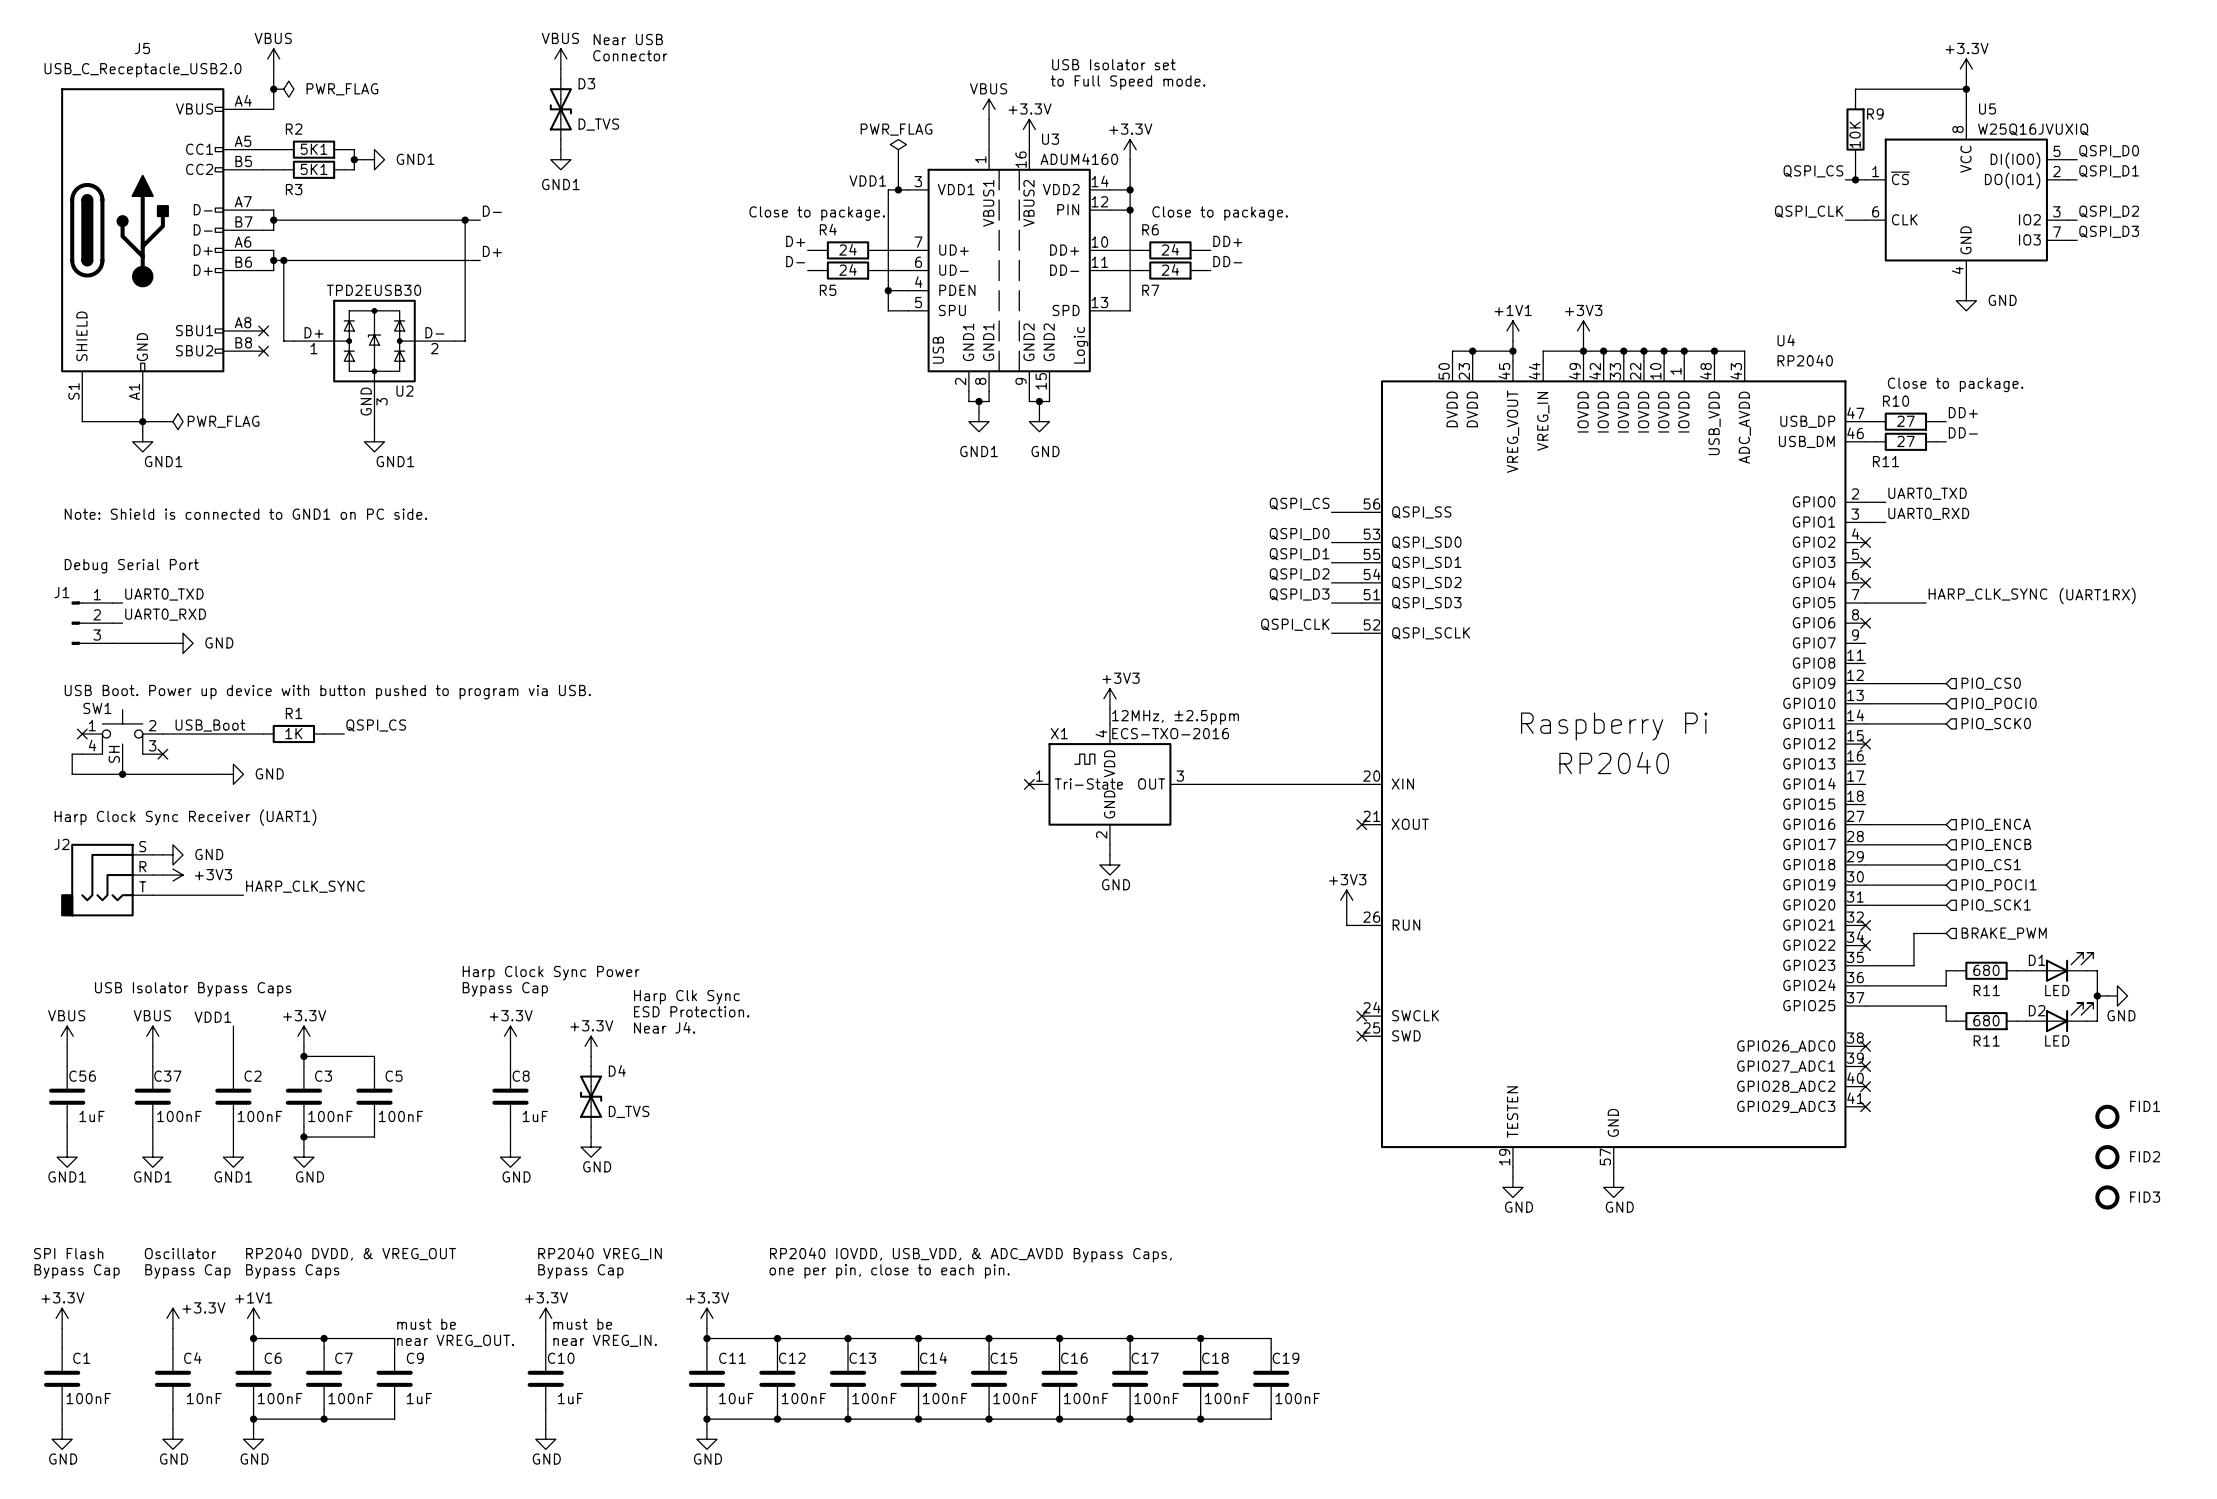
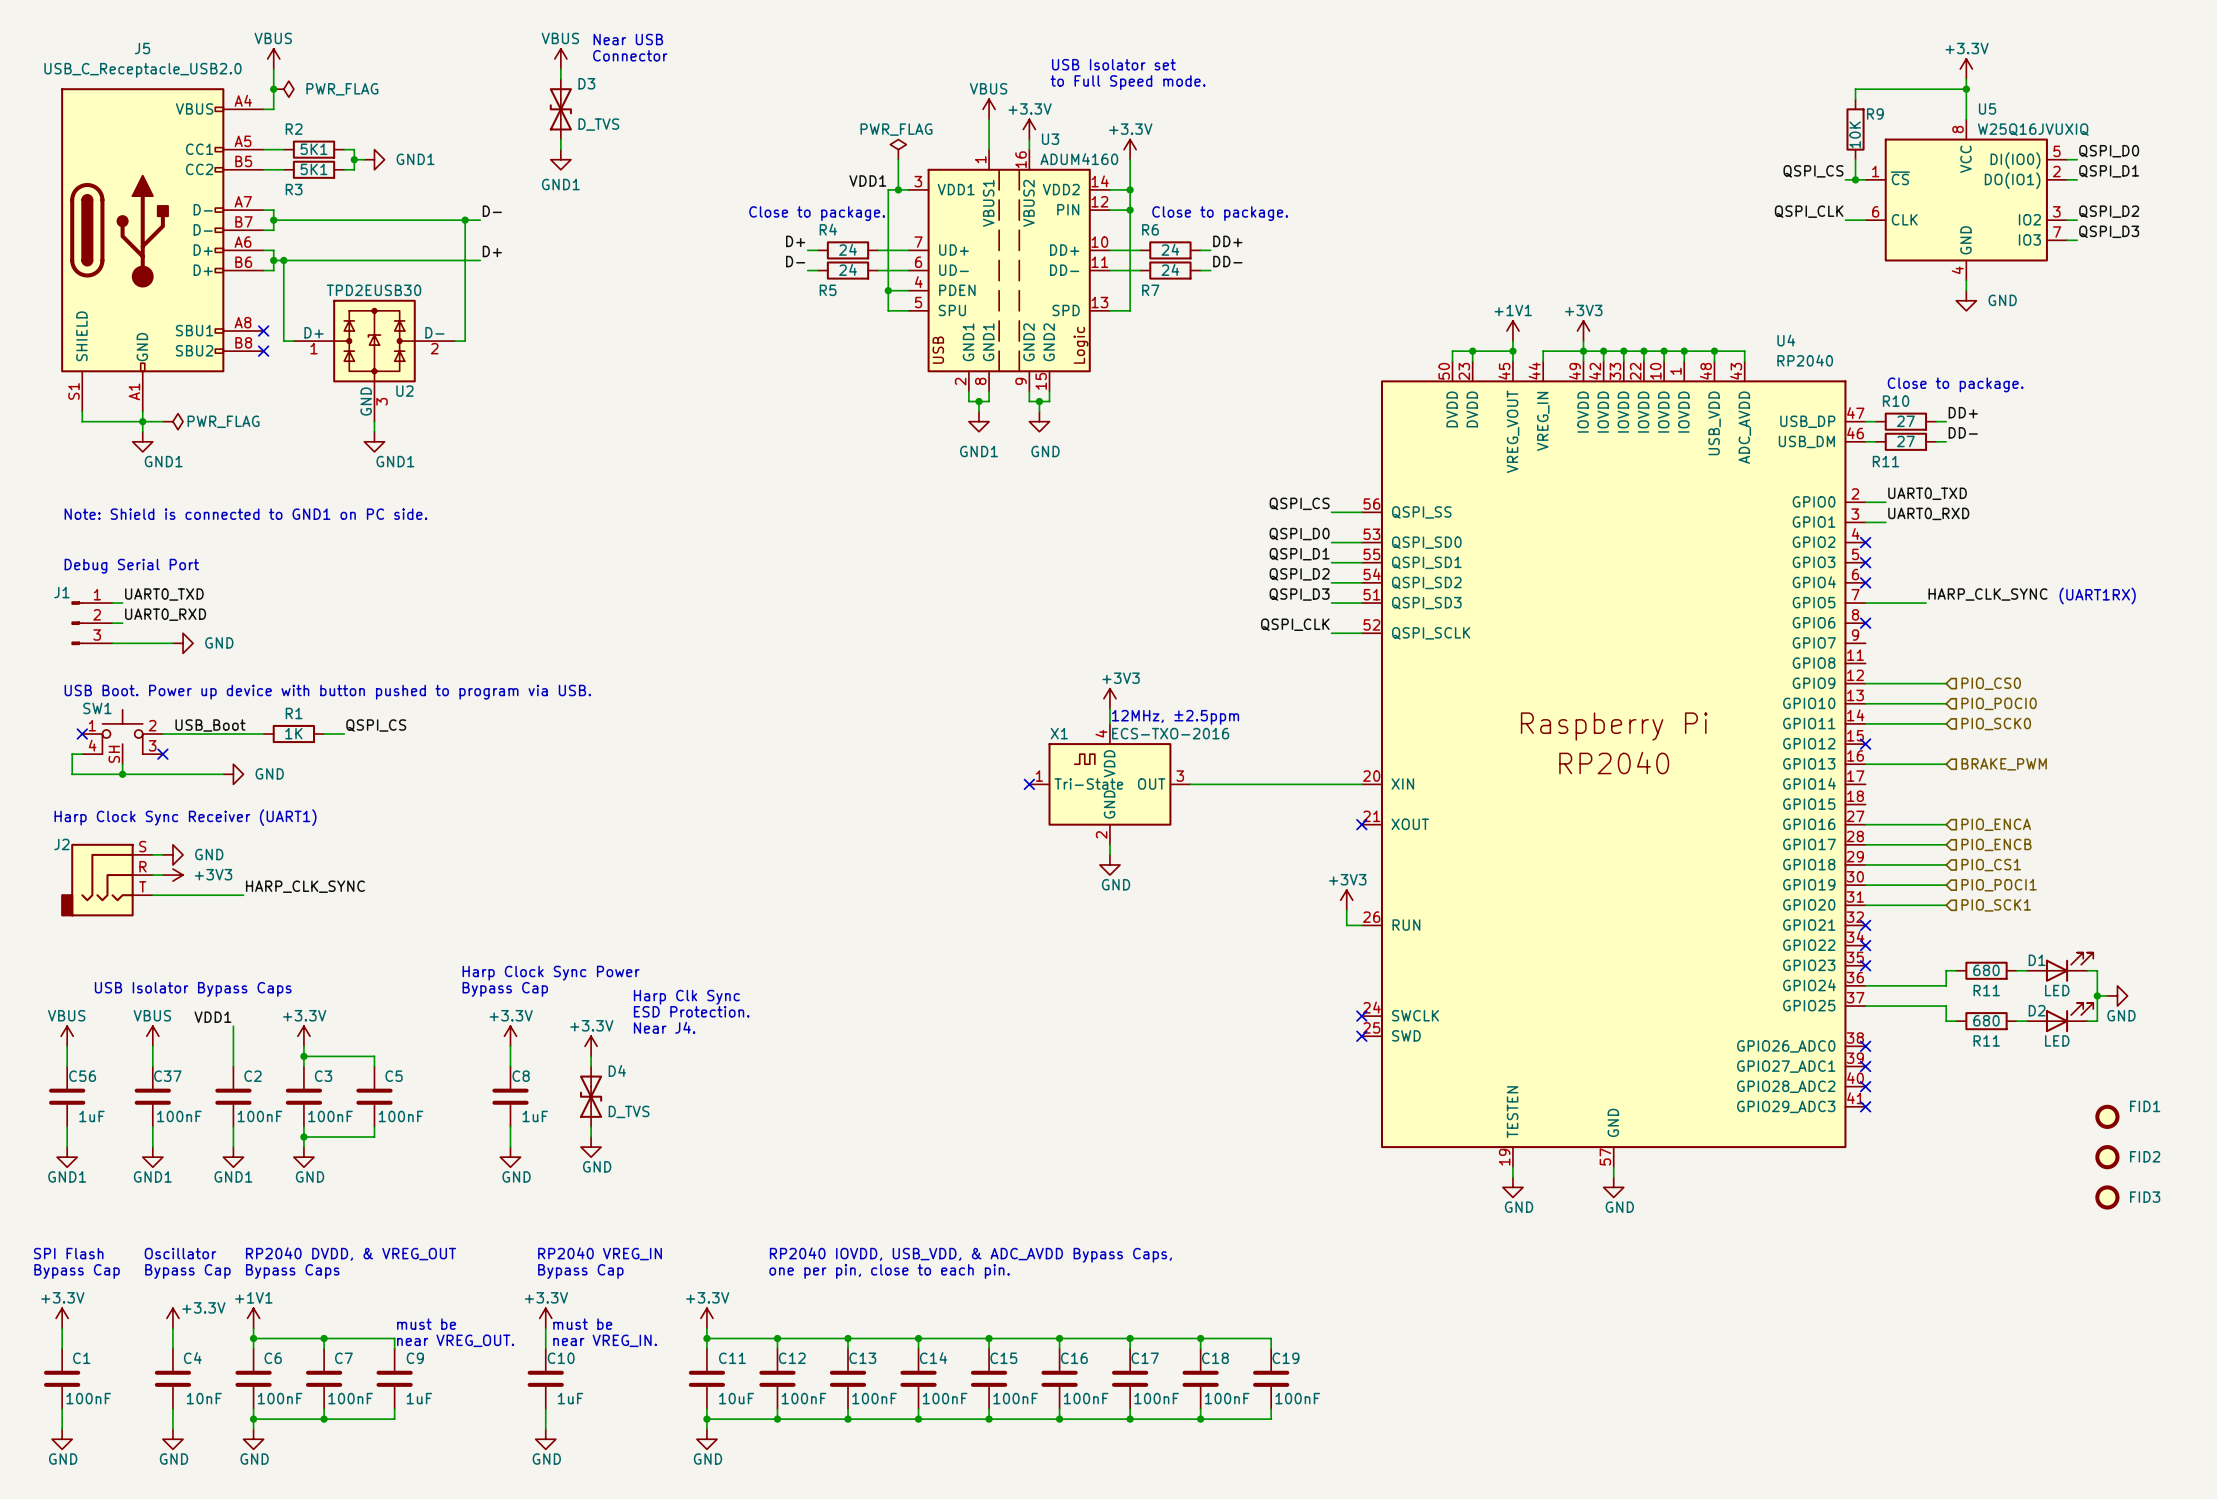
wire: none -> (1865, 764) (1946, 764)
wire: (1946, 933) (1913, 933) (1913, 965) (1865, 965) -> none
hierarchical label position: BRAKE_PWM (2004, 933) -> BRAKE_PWM (2004, 764)
no-connect mark: none -> (1865, 965)

